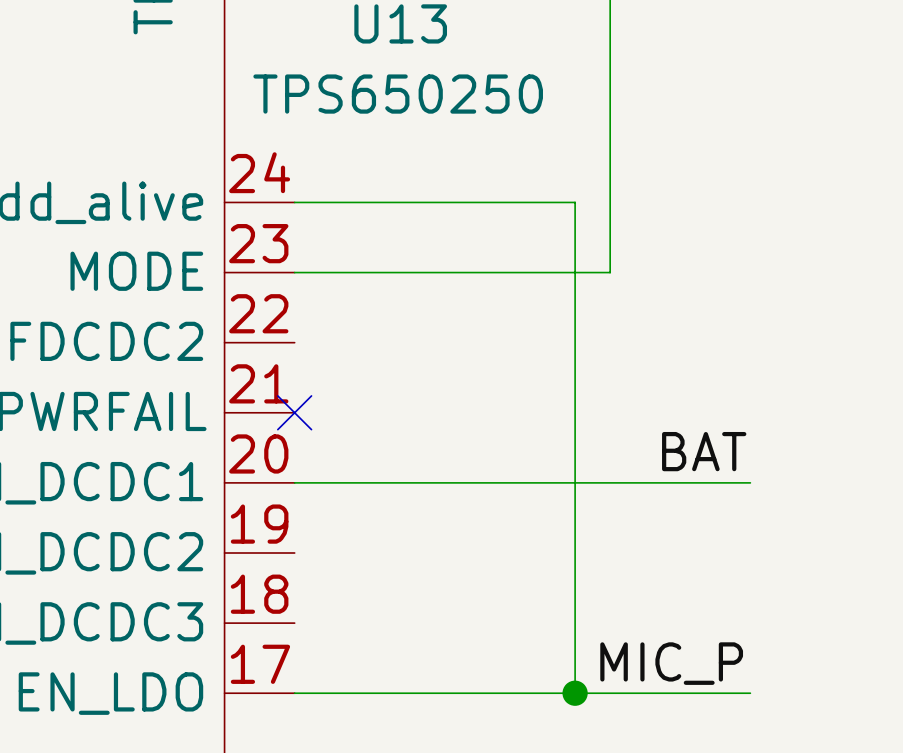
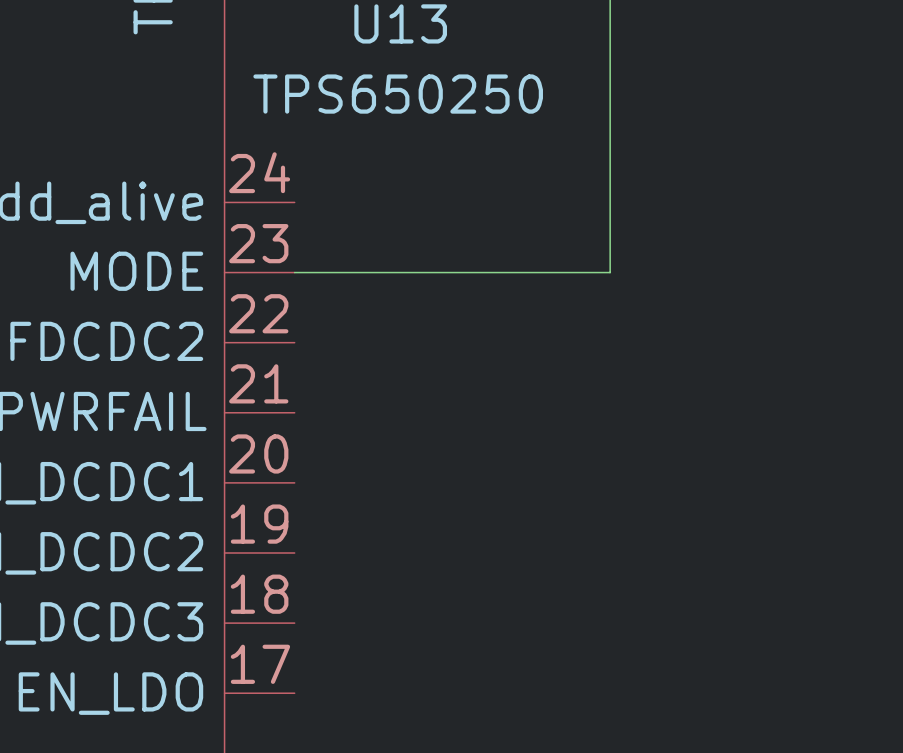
wire: (294, 202) (575, 202) (575, 693) -> none
no-connect mark: (294, 412) -> none
label: BAT (704, 451) -> none
wire: (294, 482) (750, 482) -> none
label: MIC_P (671, 663) -> none
wire: (294, 693) (750, 693) -> none
junction: (575, 693) -> none

